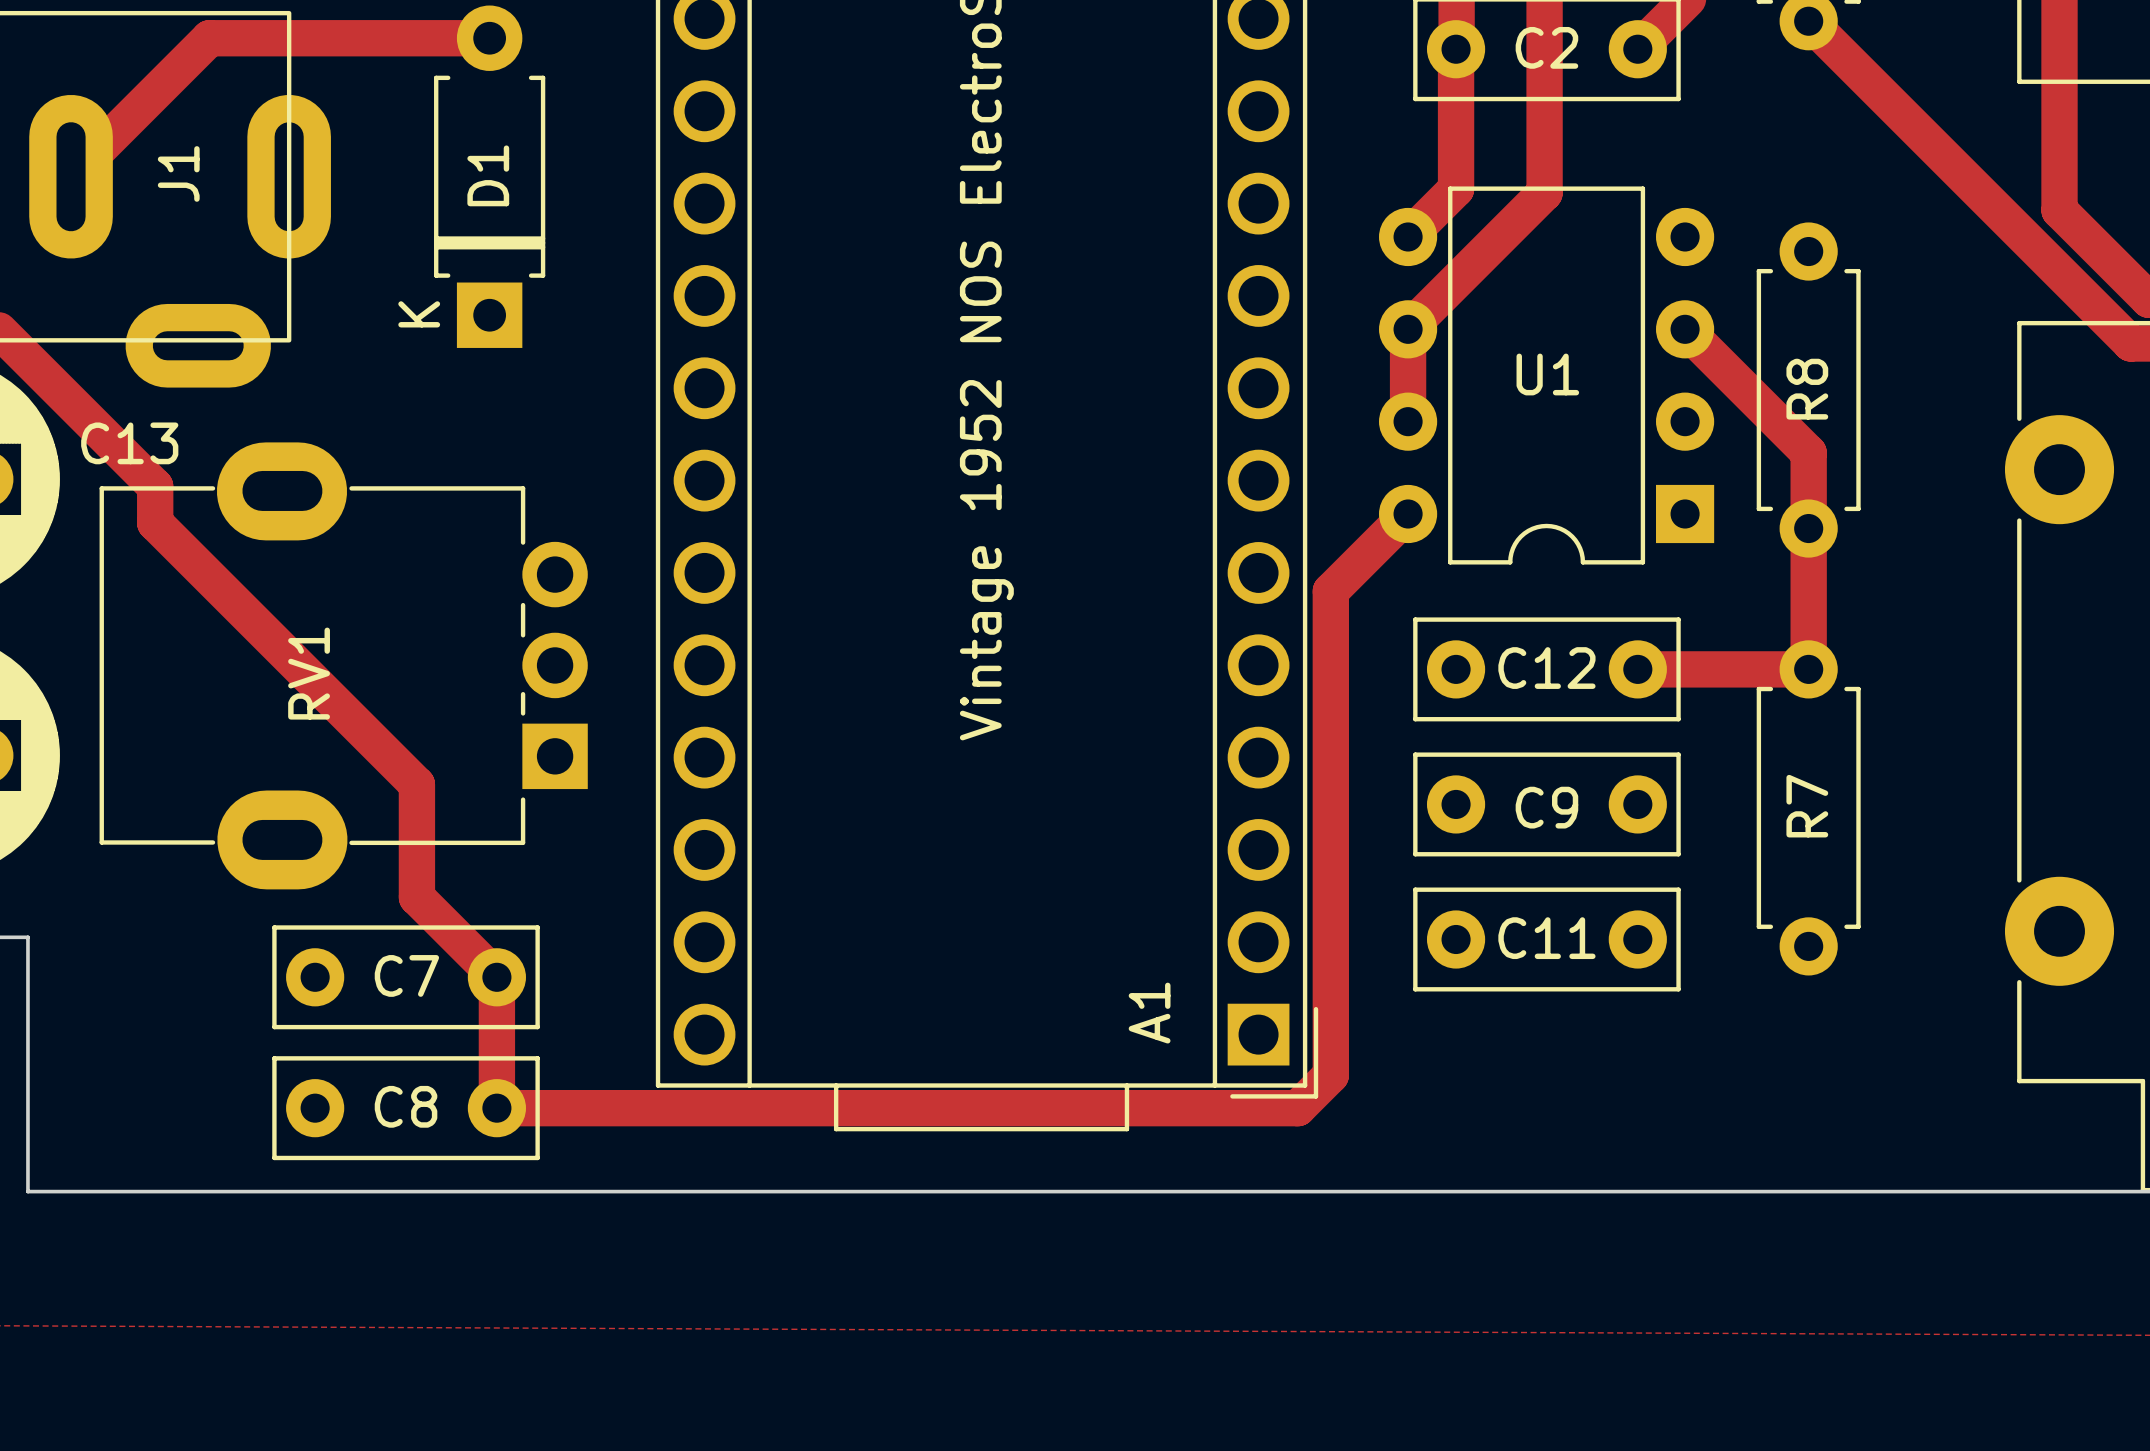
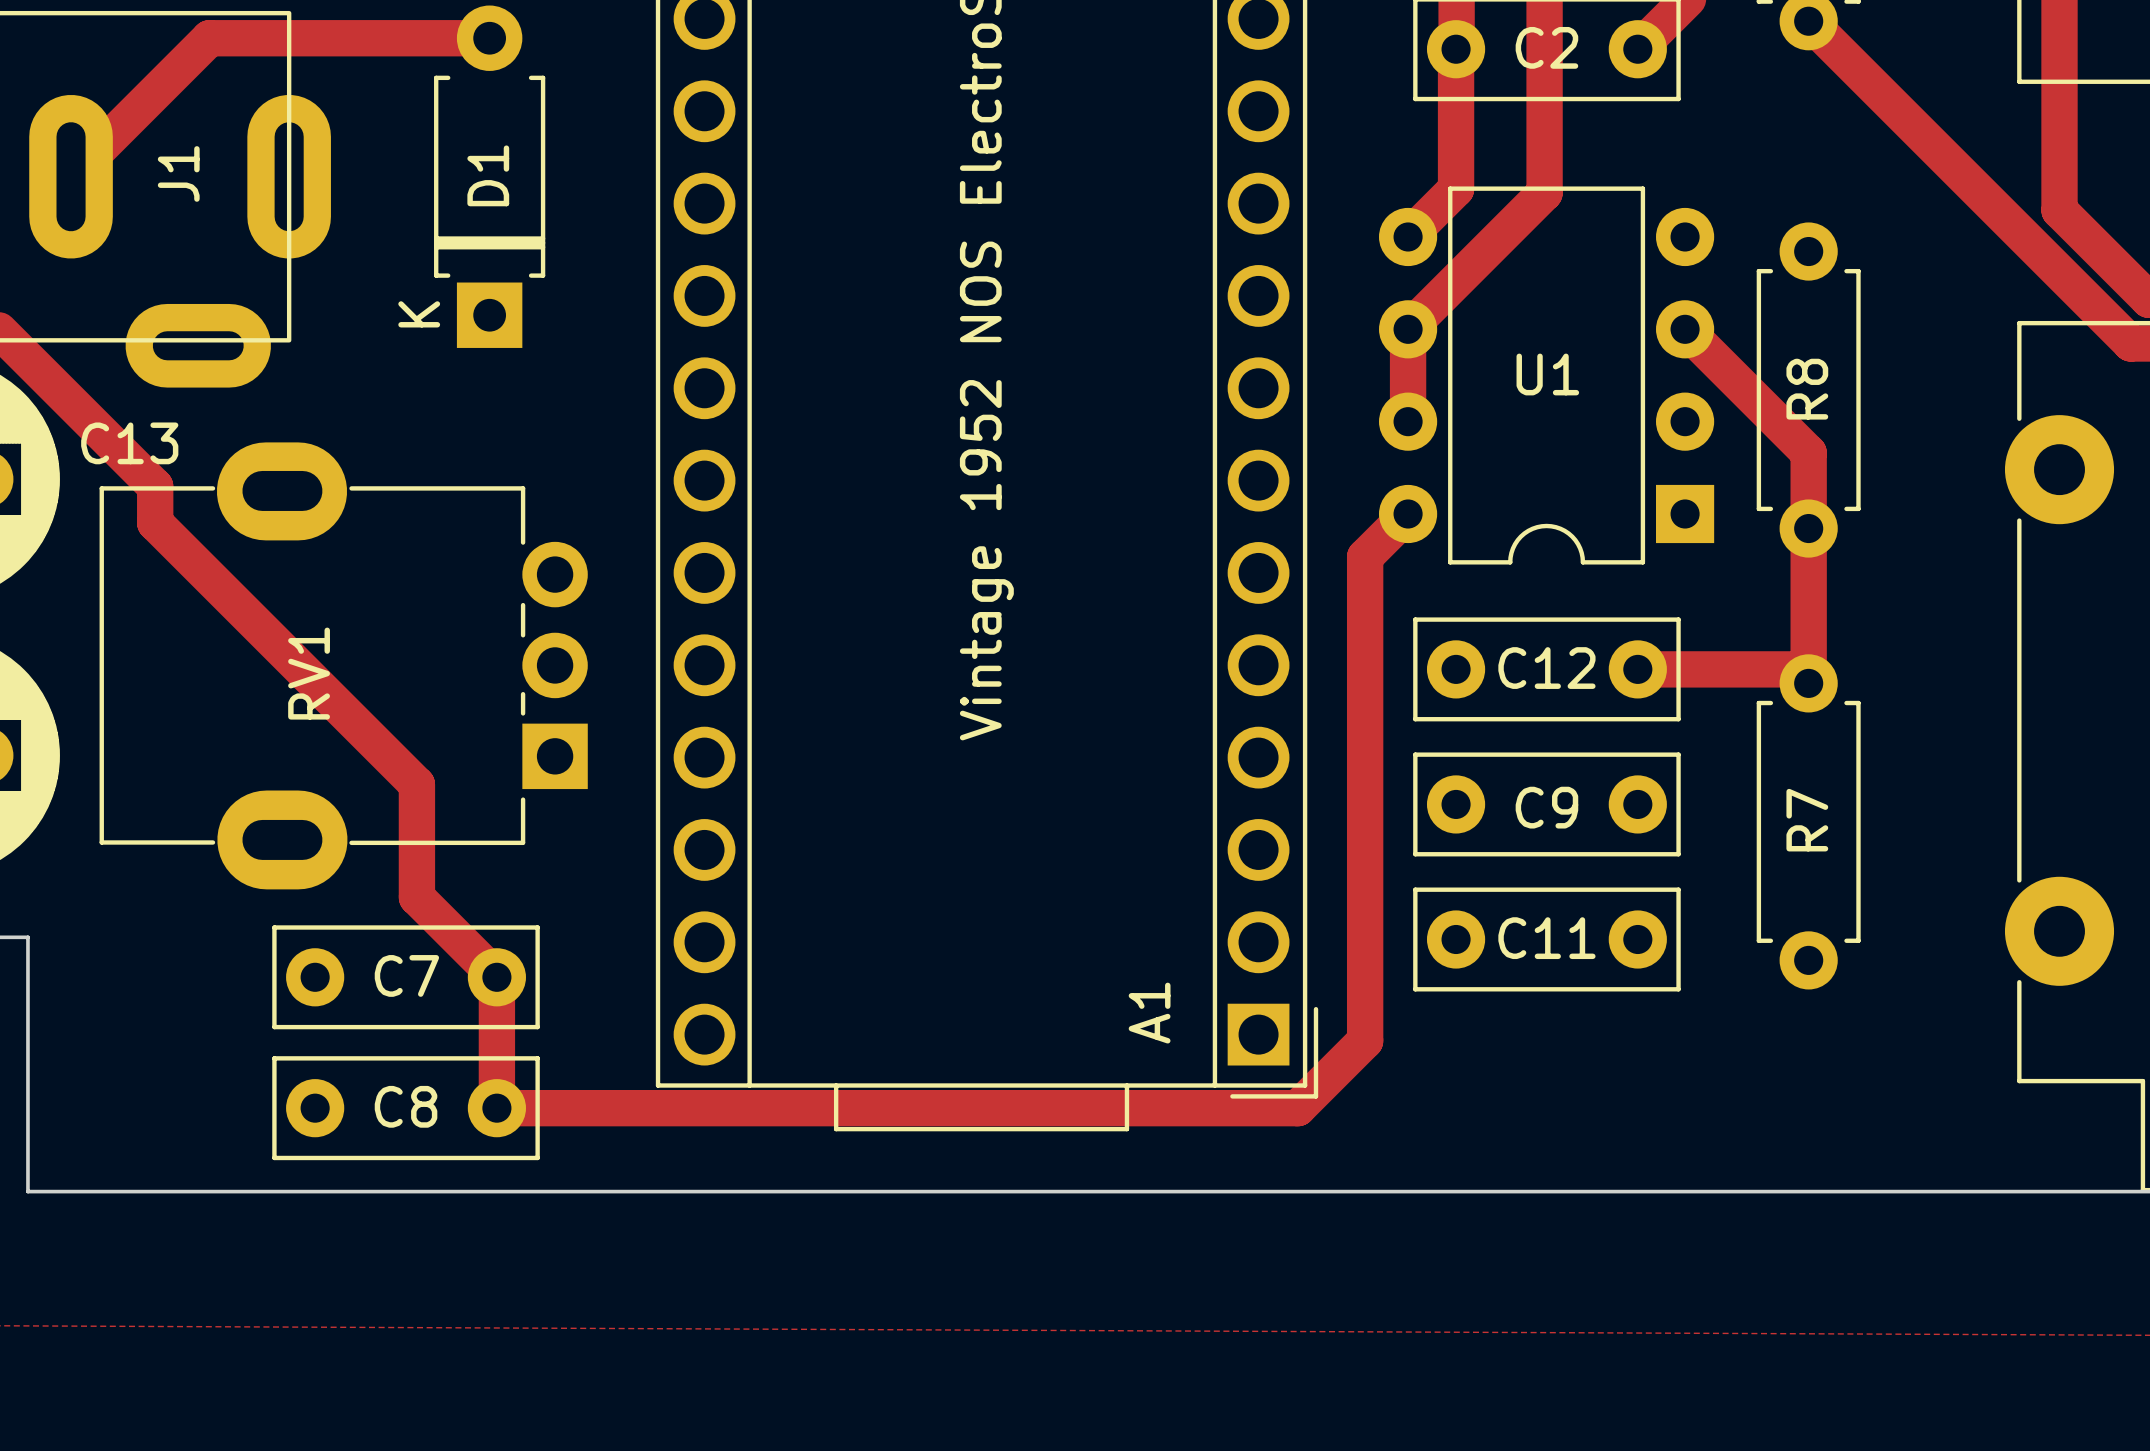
track: (1365, 556) (1330, 591) (1330, 1075) -> (1365, 556) (1365, 1040) (1330, 1075)
R7 position: (1808, 807) -> (1808, 821)

